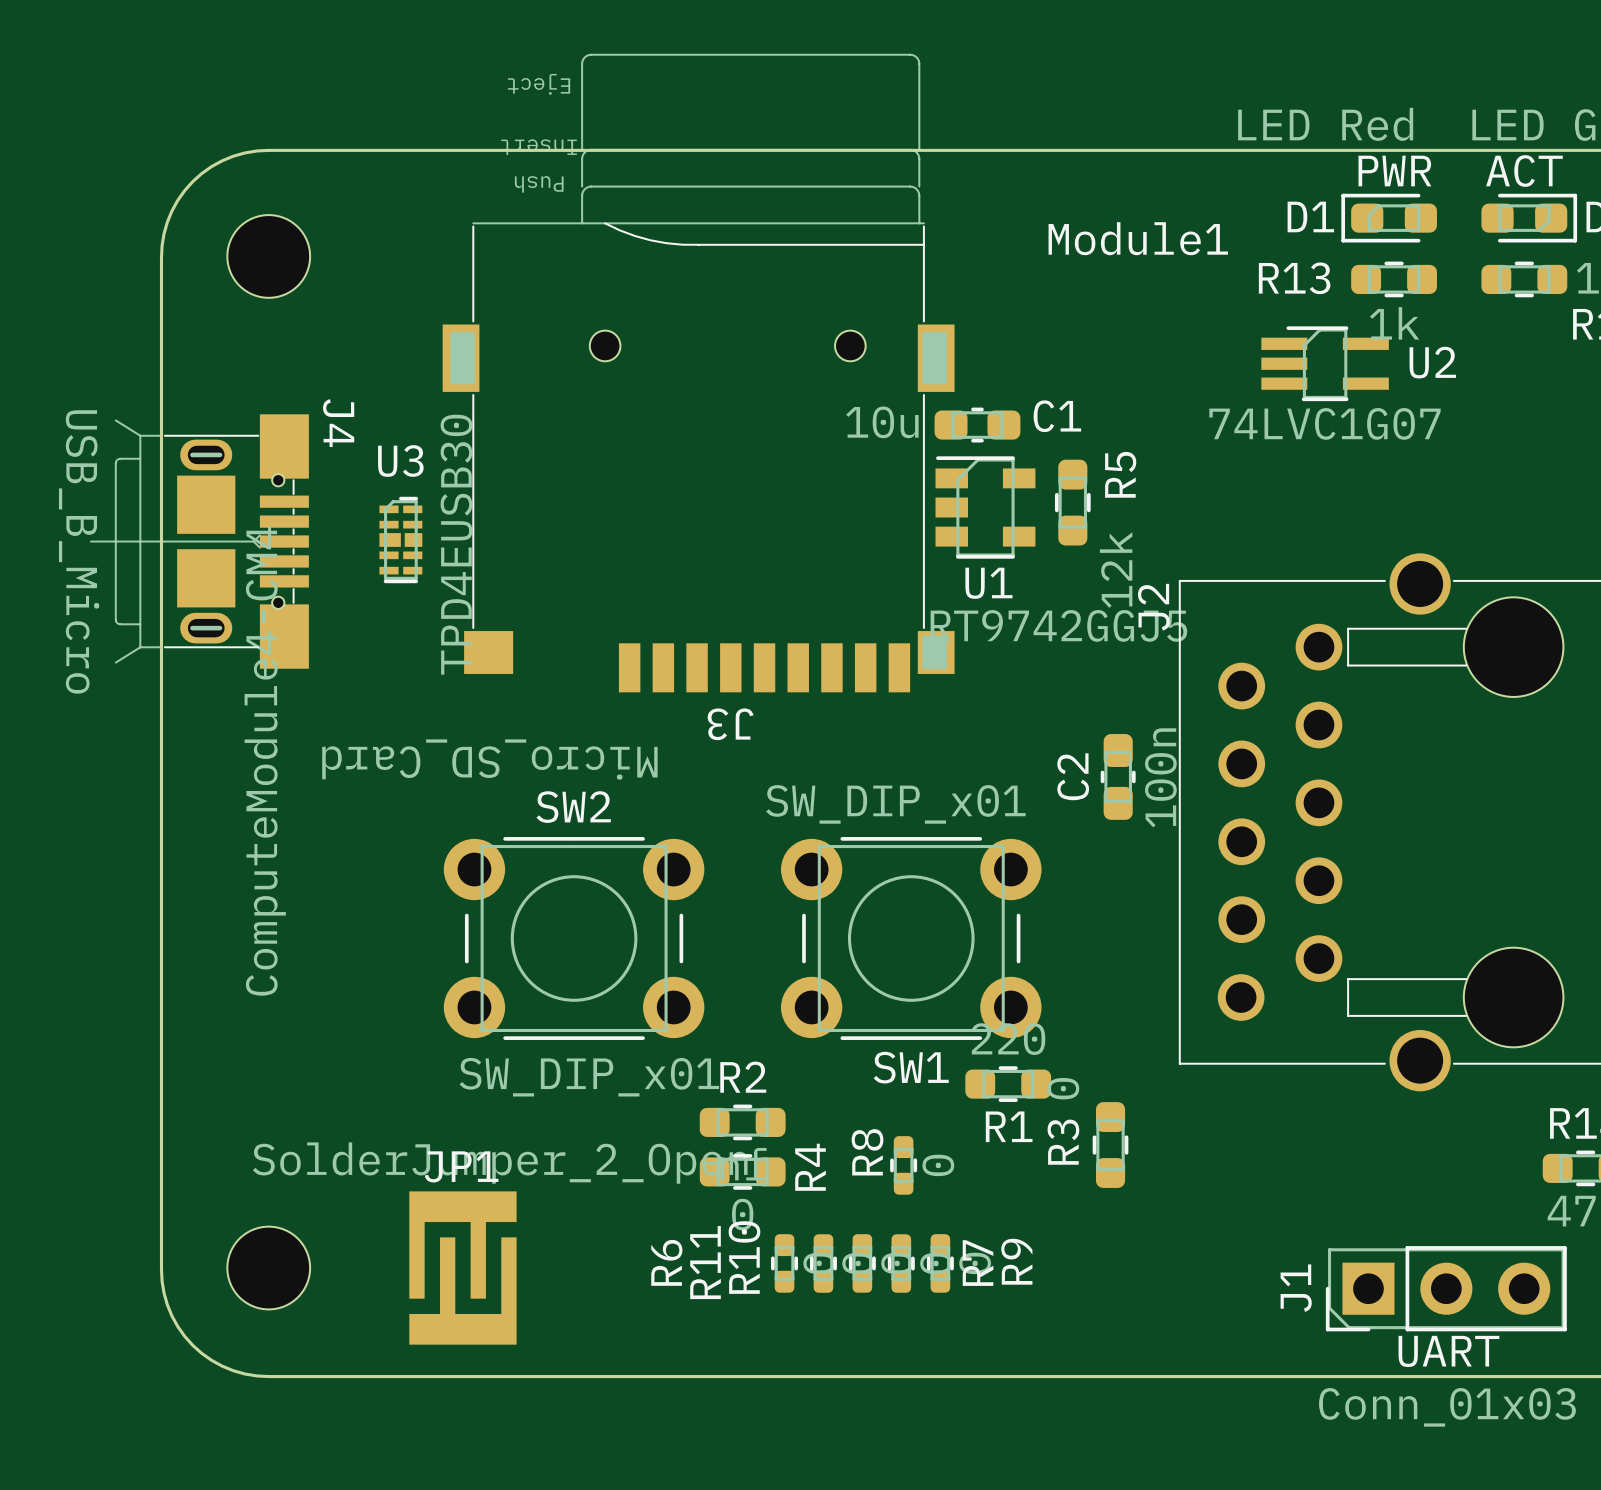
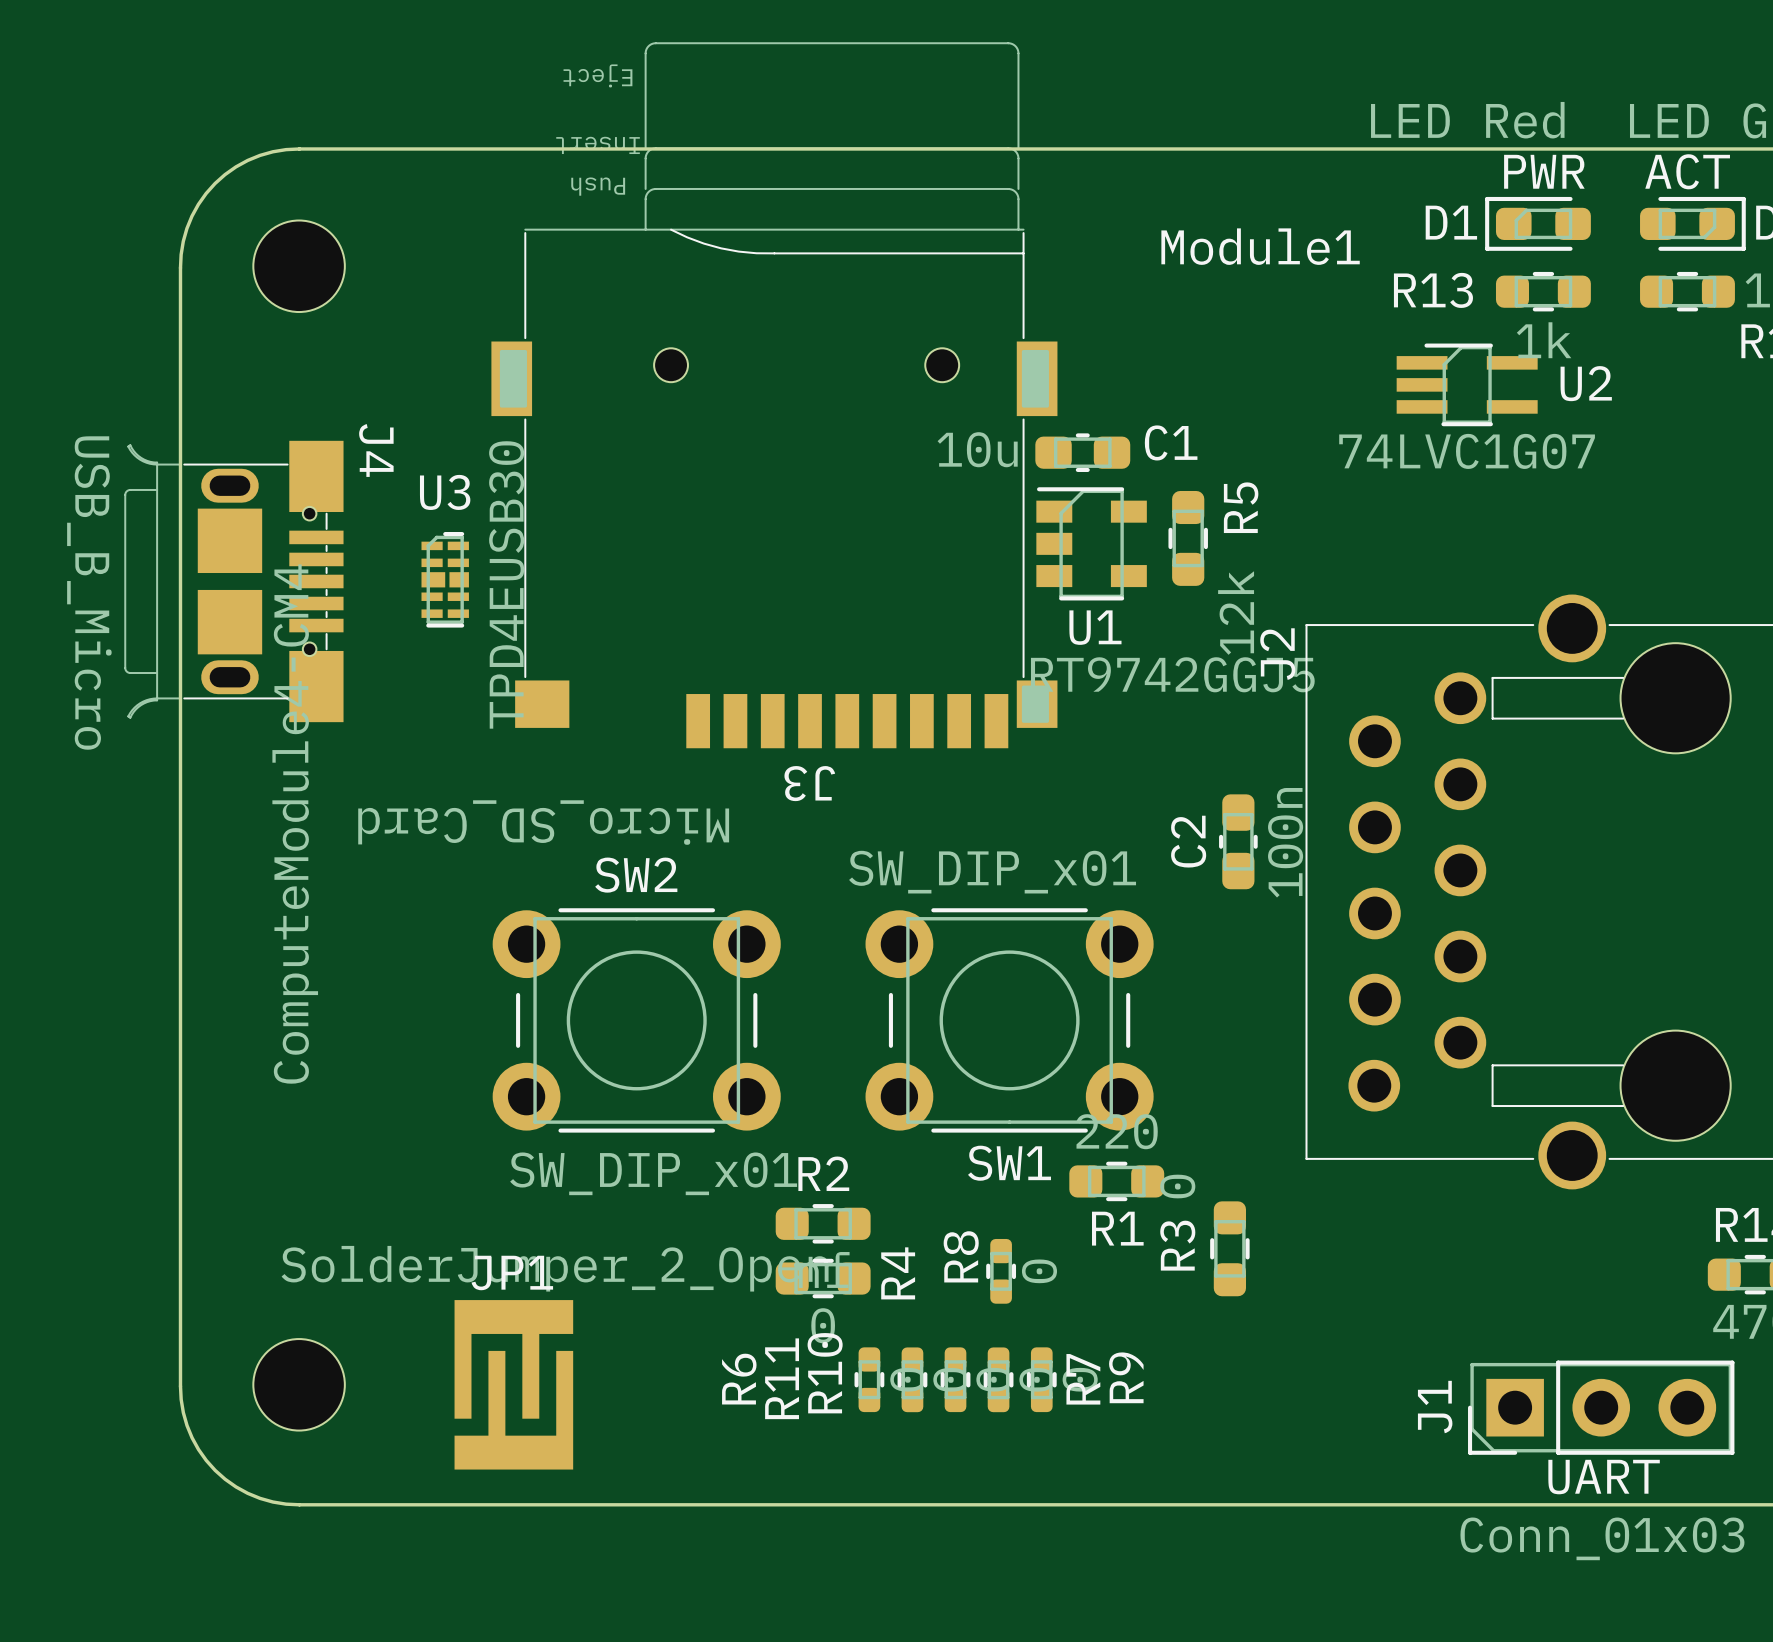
J4 footprint: [90, 414, 309, 669] -> [124, 440, 344, 723]

